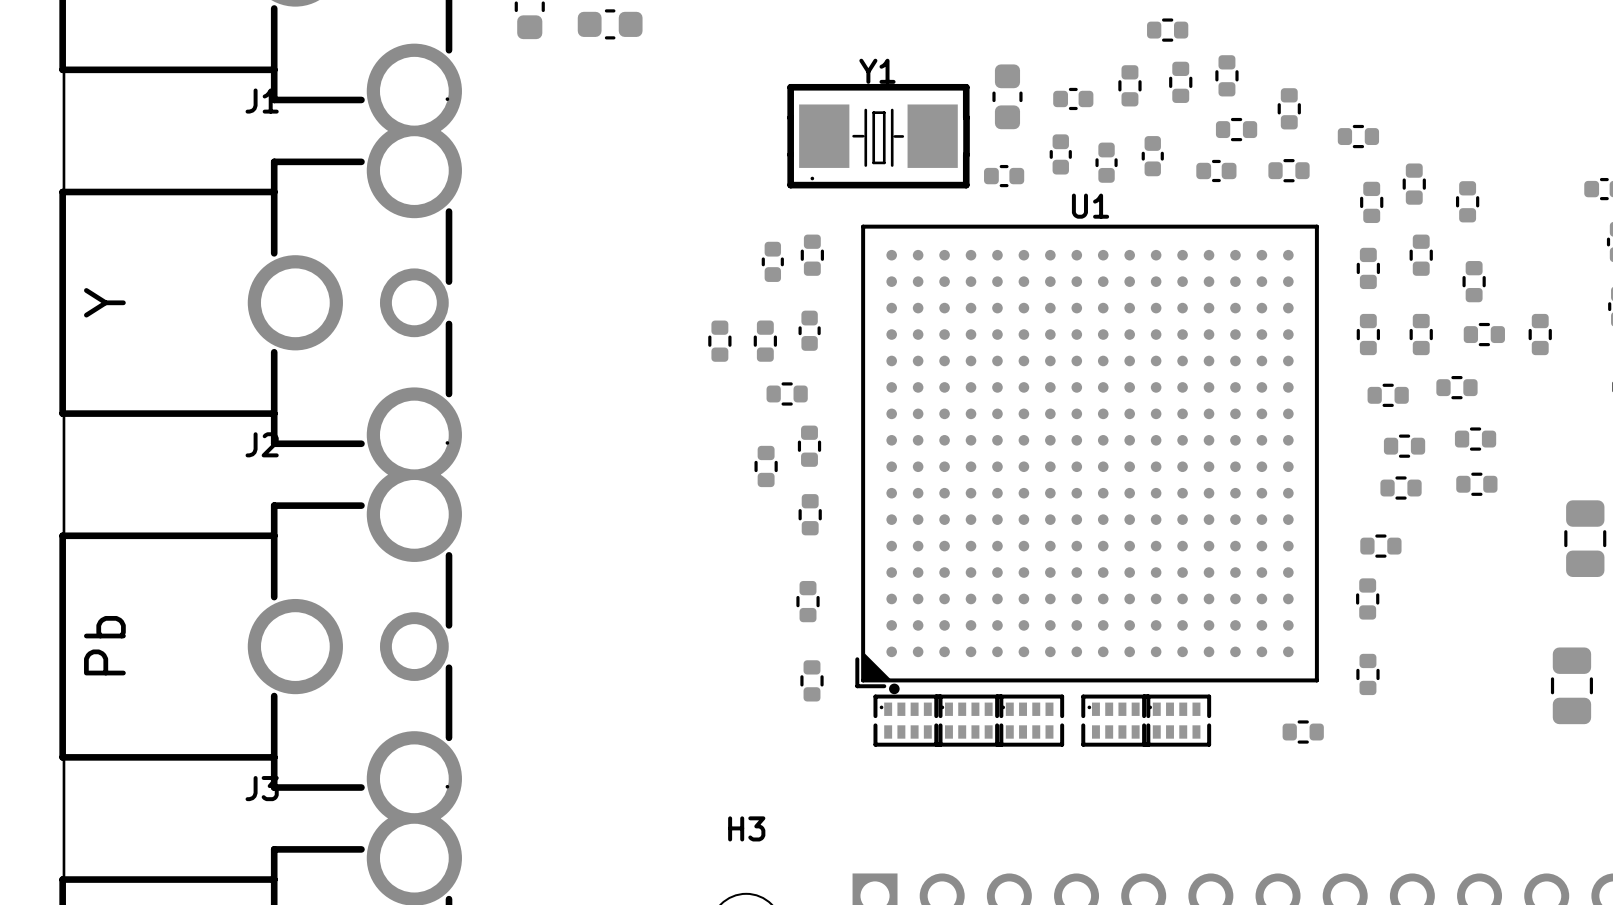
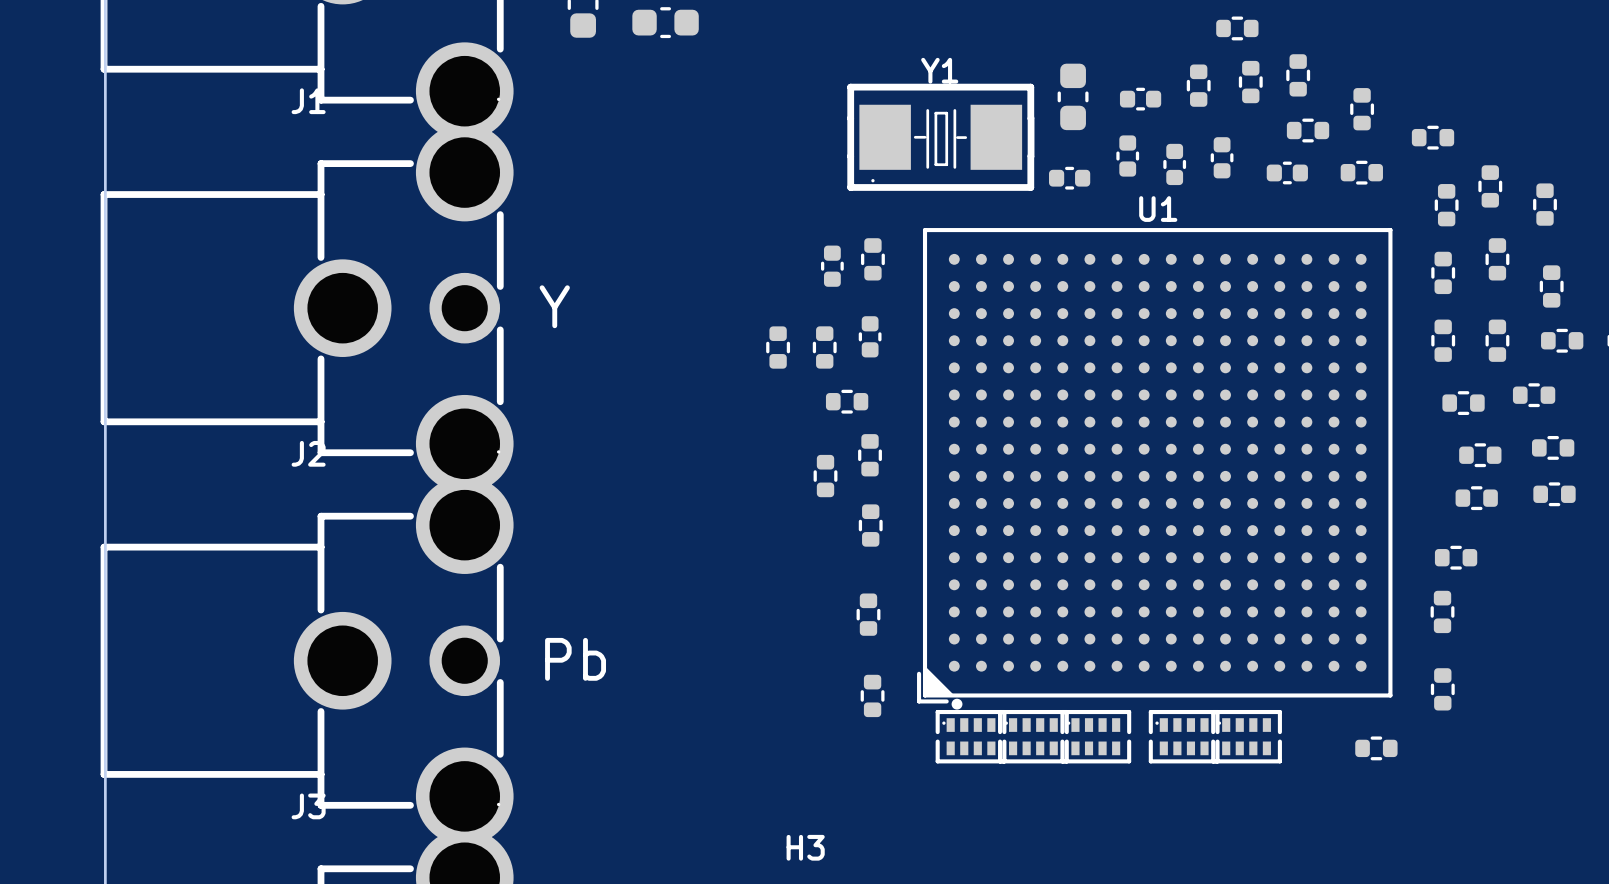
text rotation: 0° (104, 302) -> 90° clockwise (554, 306)
text position: Y (104, 302) -> Y (554, 306)
text rotation: 0° (104, 645) -> 90° clockwise (575, 659)
text position: Pb (104, 645) -> Pb (575, 659)

